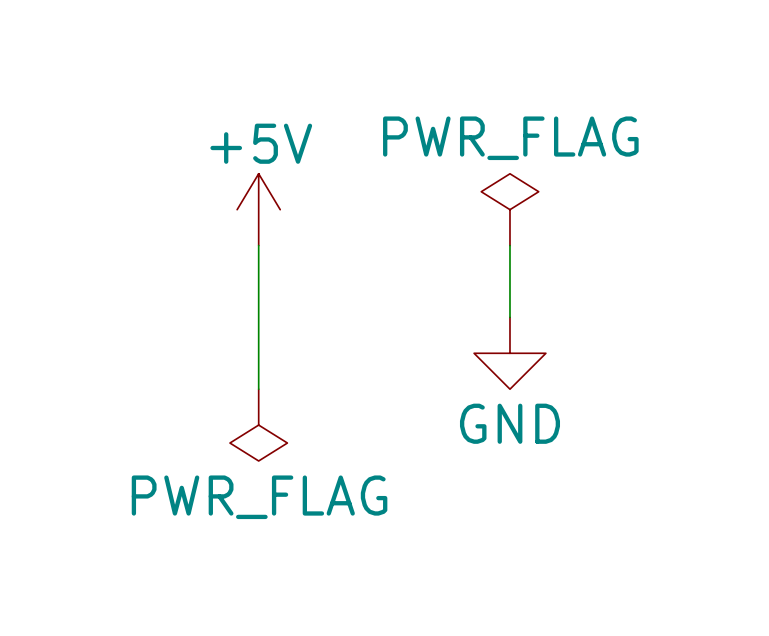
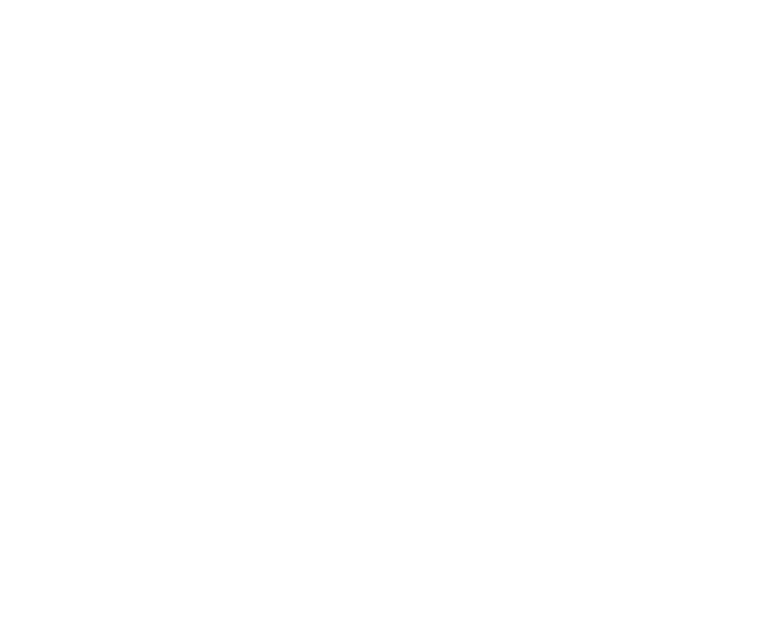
power symbol: +5V (258, 209) -> none
power symbol: PWR_FLAG (509, 209) -> none
wire: (258, 245) (258, 389) -> none
wire: (509, 245) (509, 317) -> none
power symbol: GND (509, 353) -> none
power symbol: PWR_FLAG (258, 425) -> none

